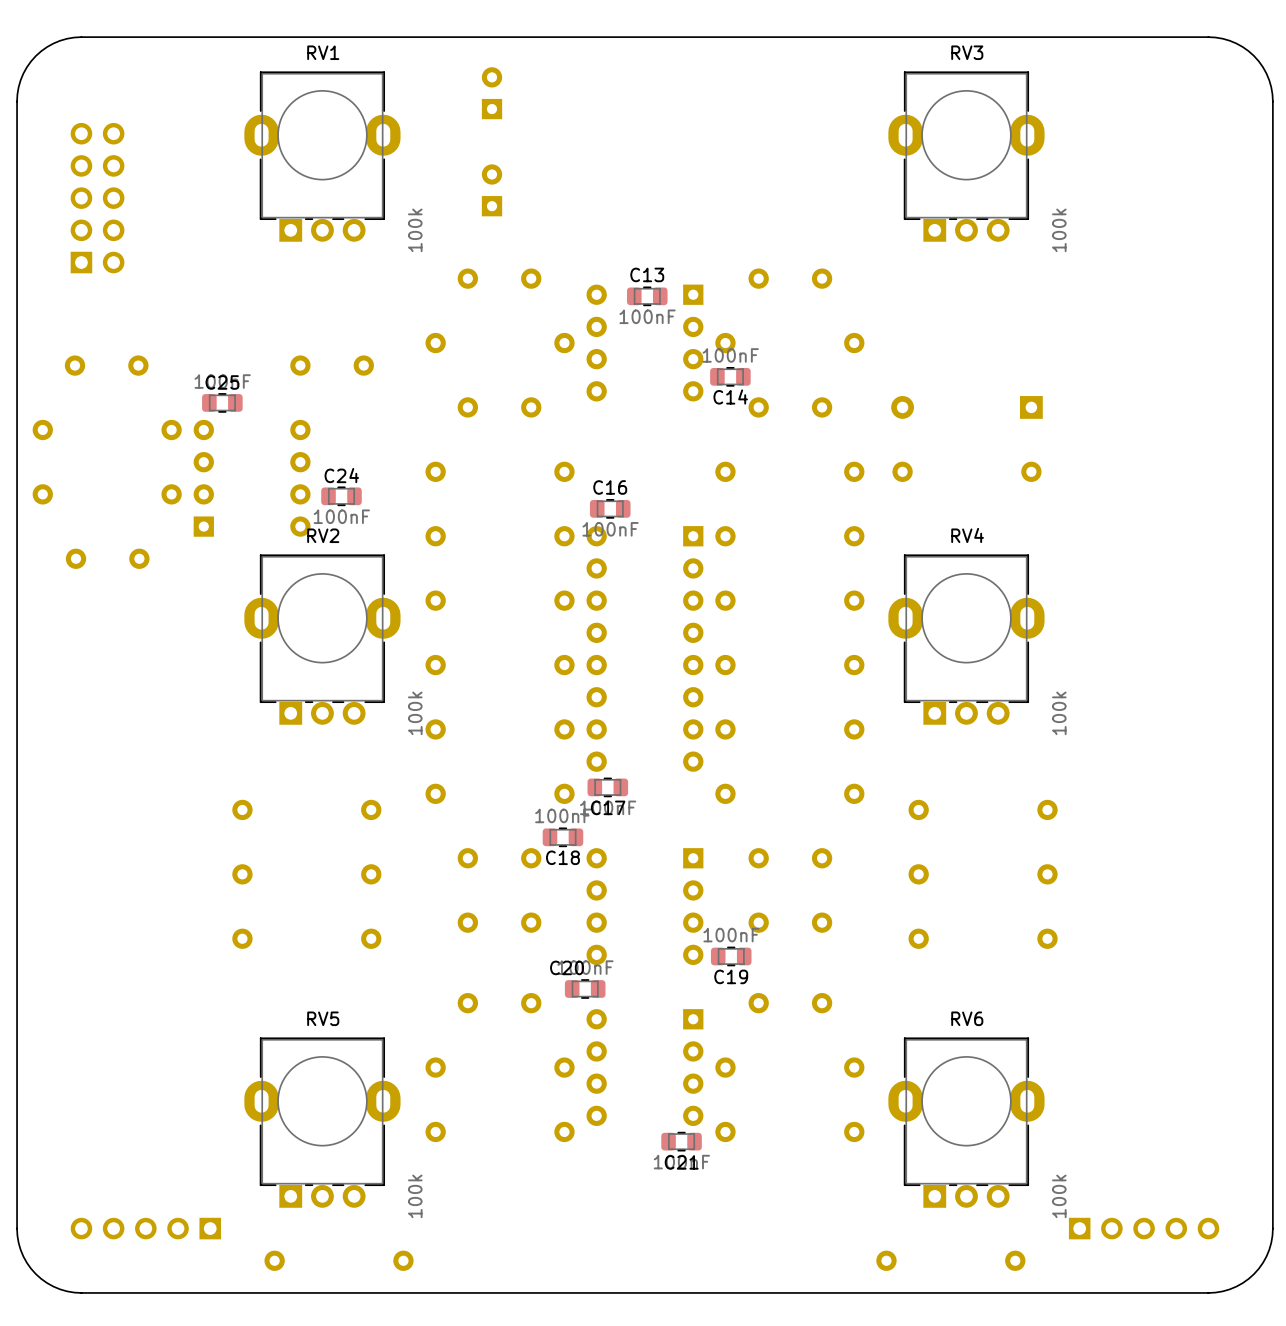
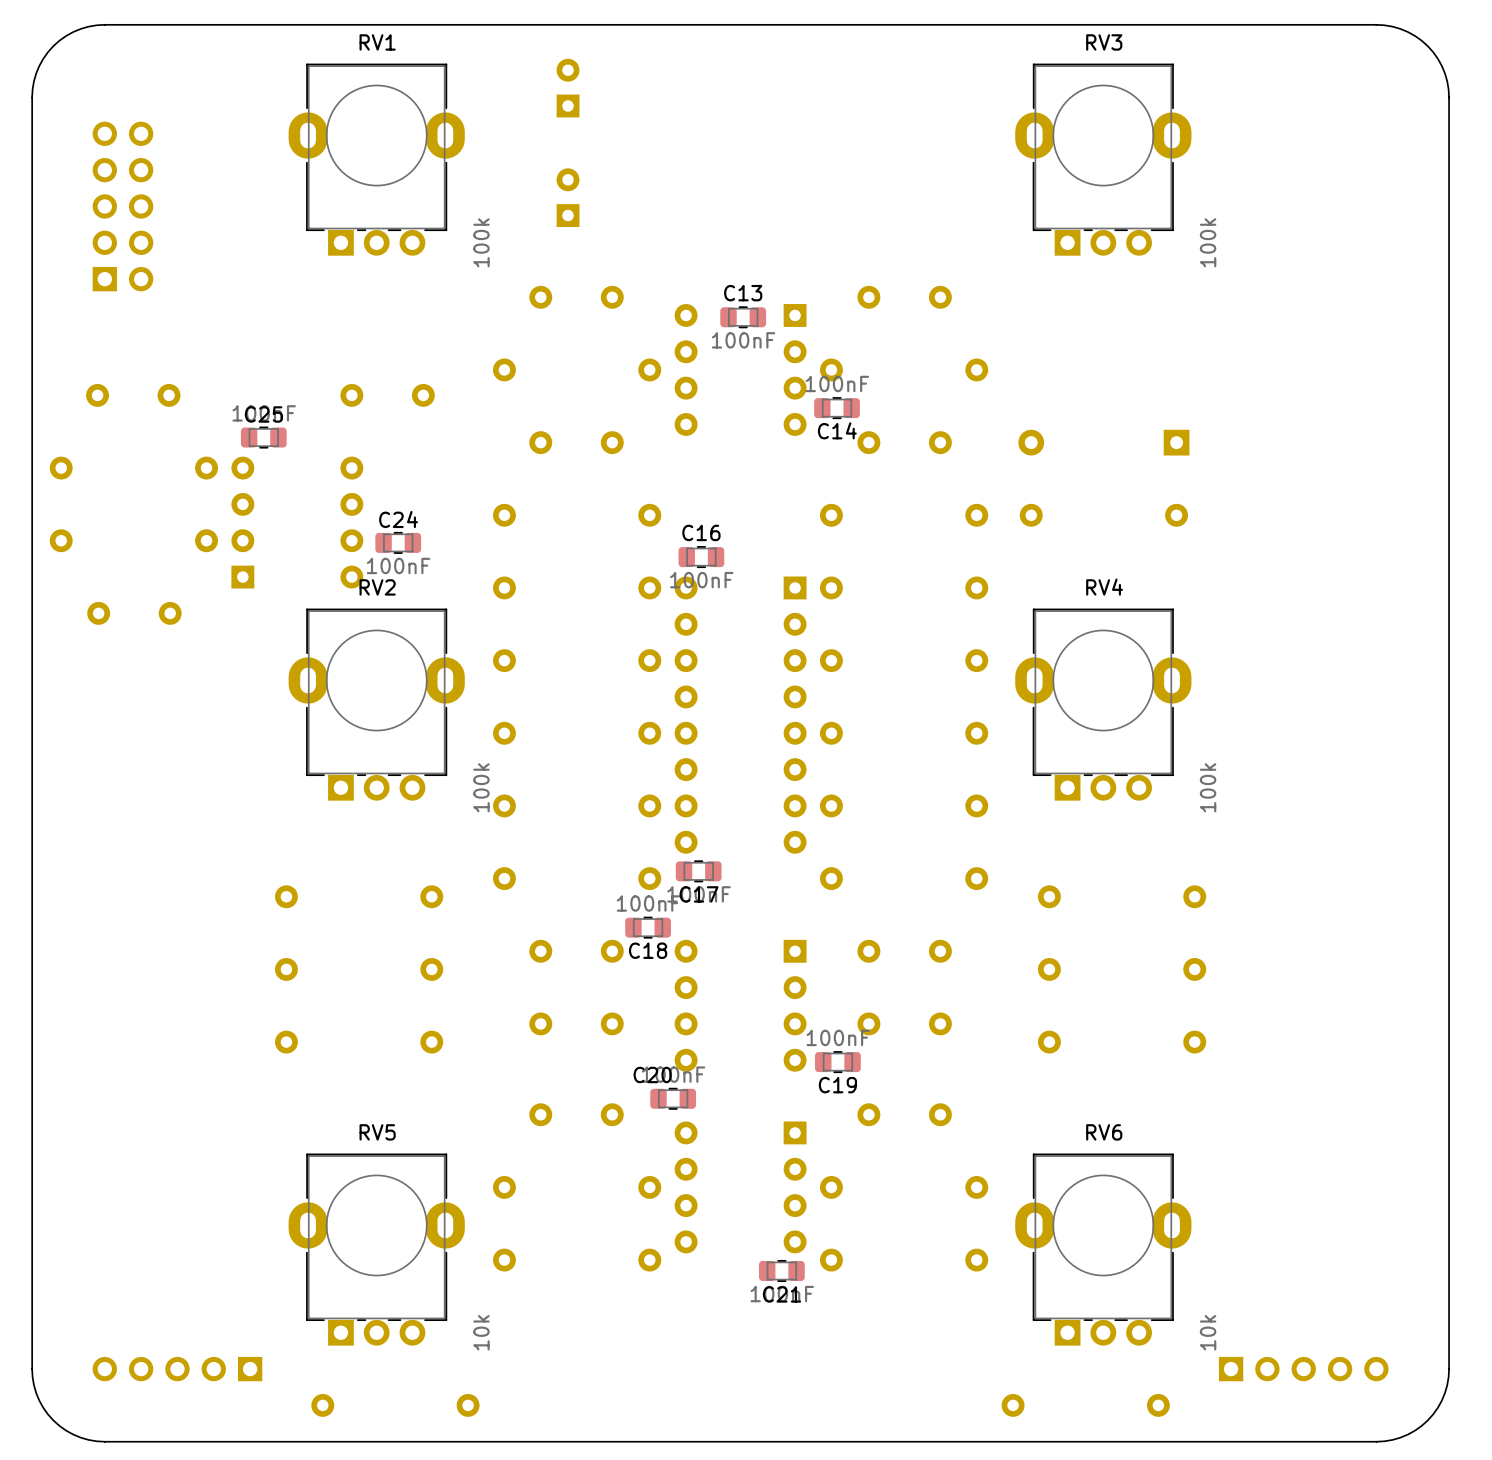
RV5 value: 100k (415, 1196) -> 10k (481, 1332)
RV6 value: 100k (1059, 1196) -> 10k (1208, 1332)

